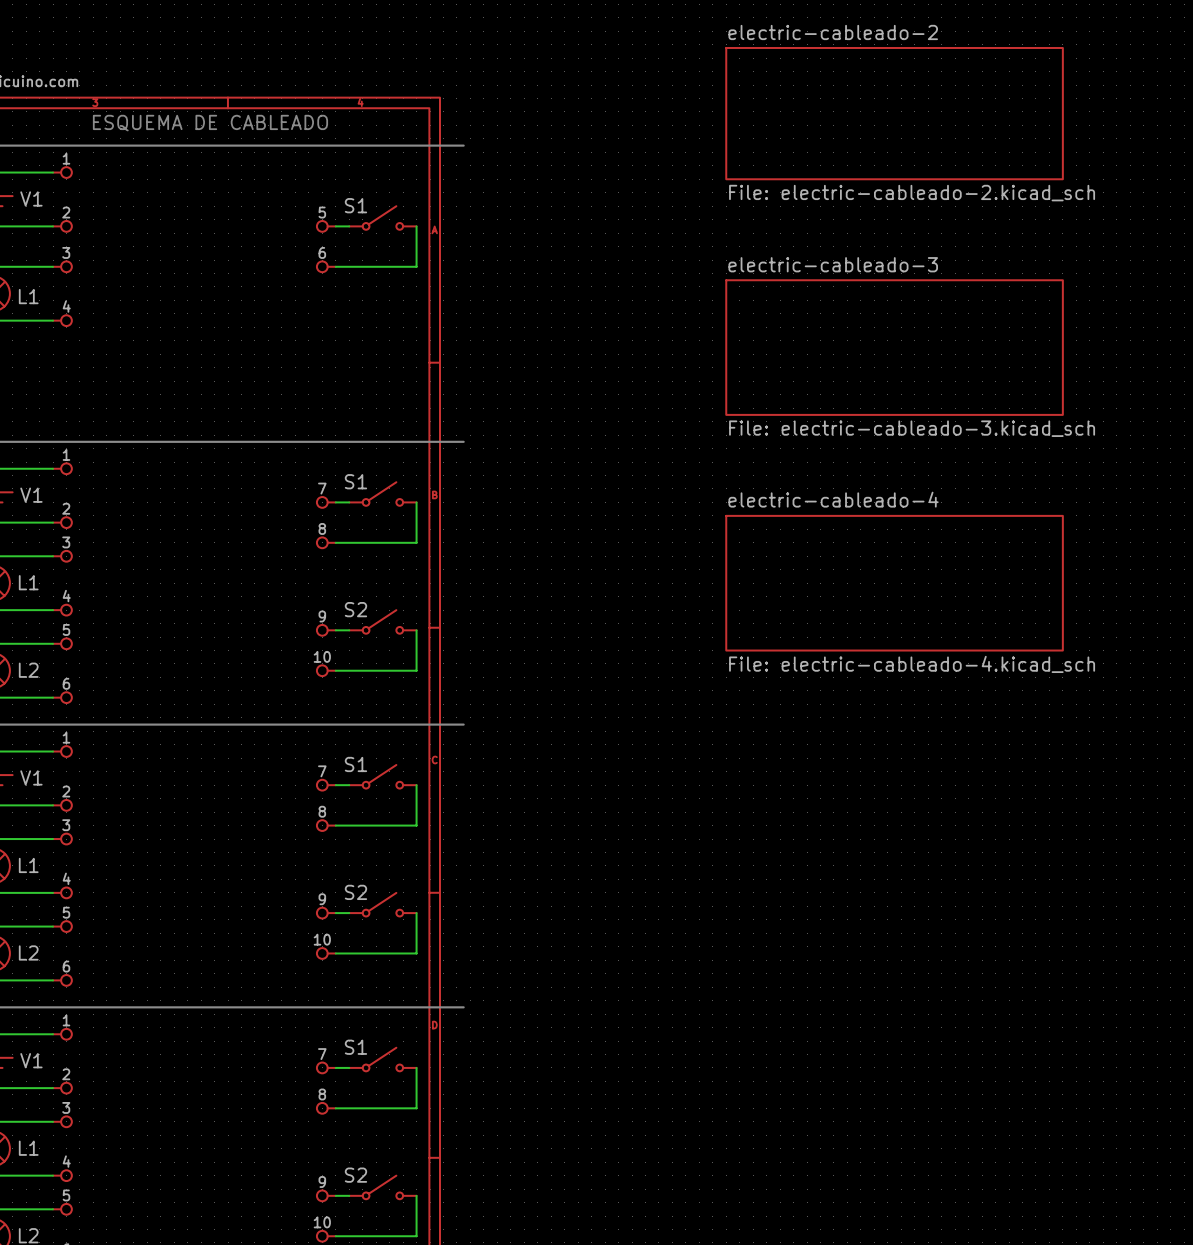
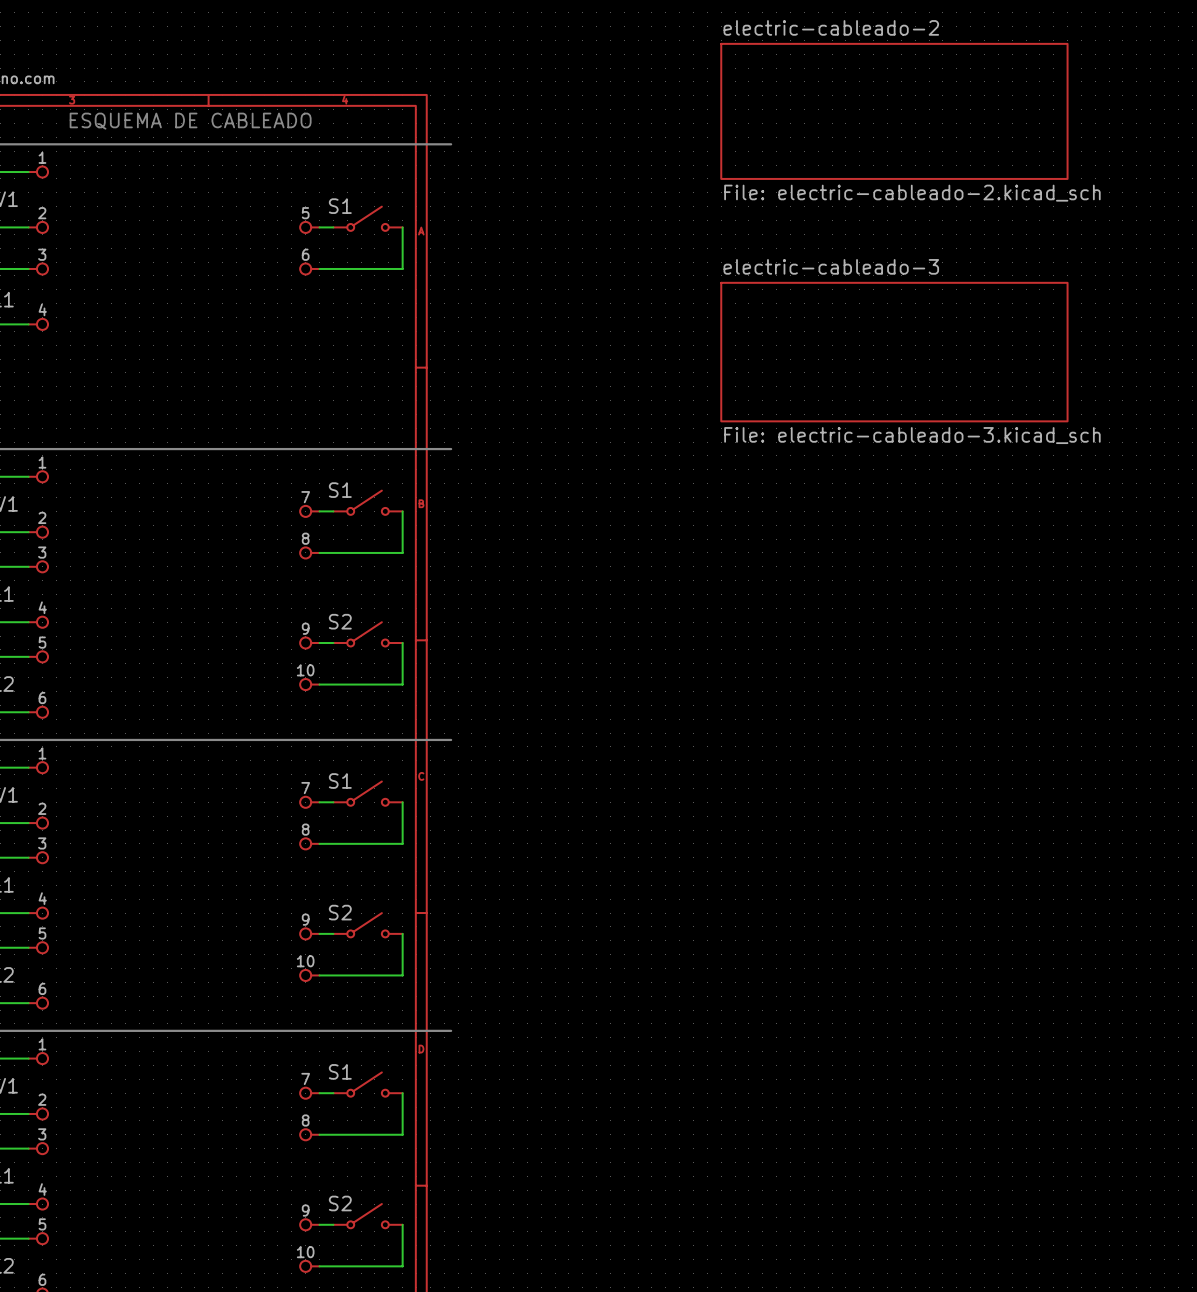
sheet electric-cableado-4: File: electric-cableado-4.kicad_sch (894, 583) -> none

